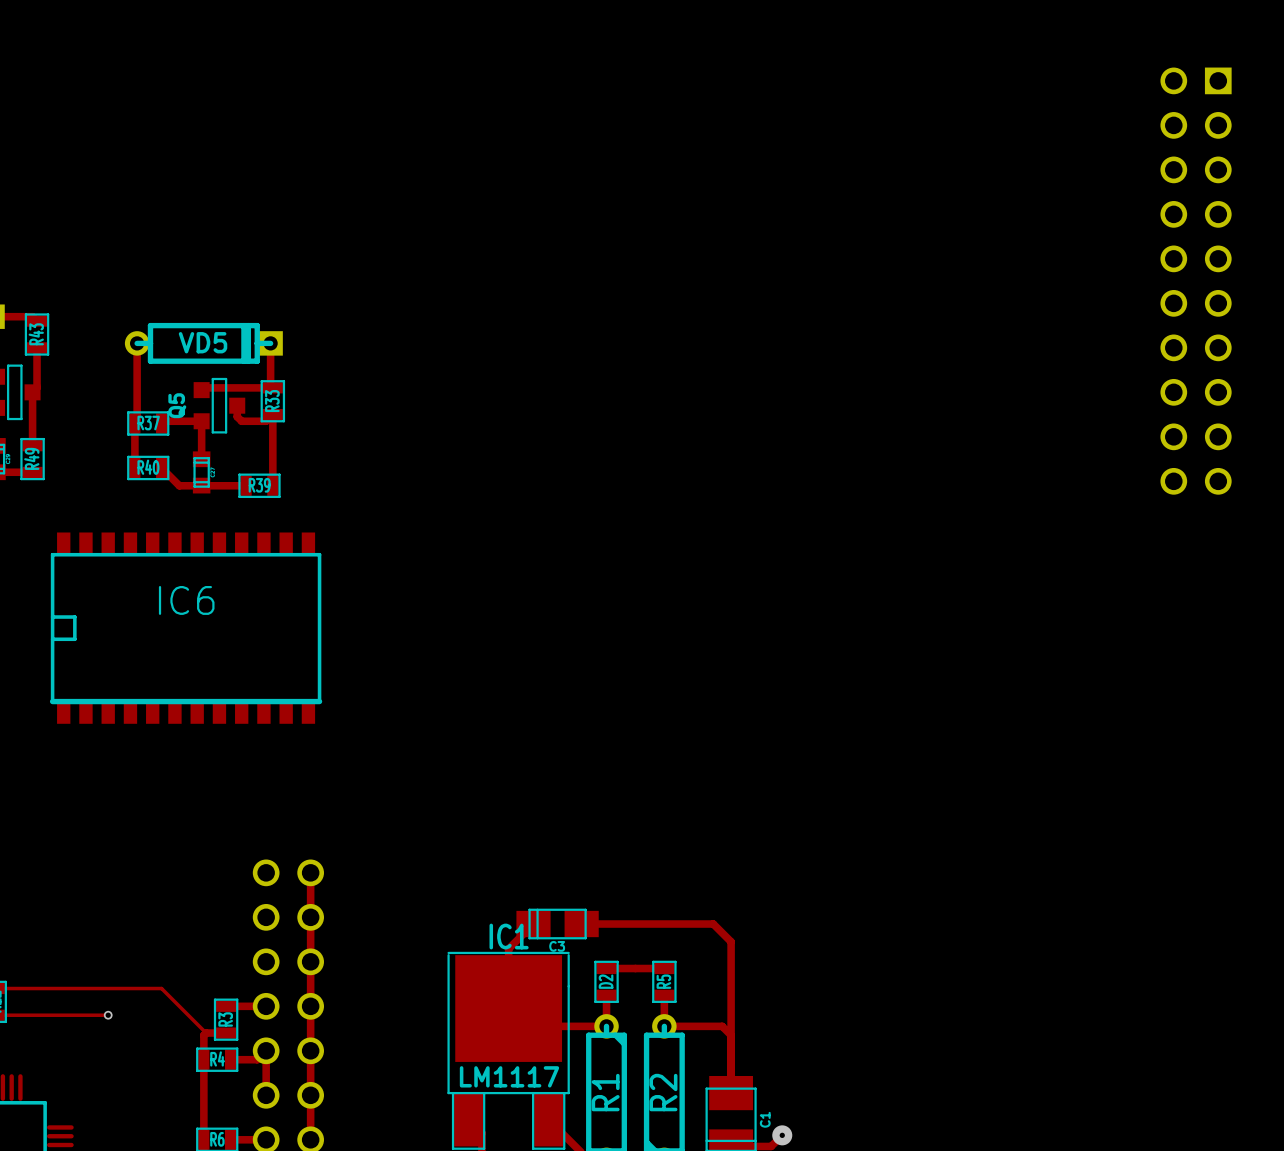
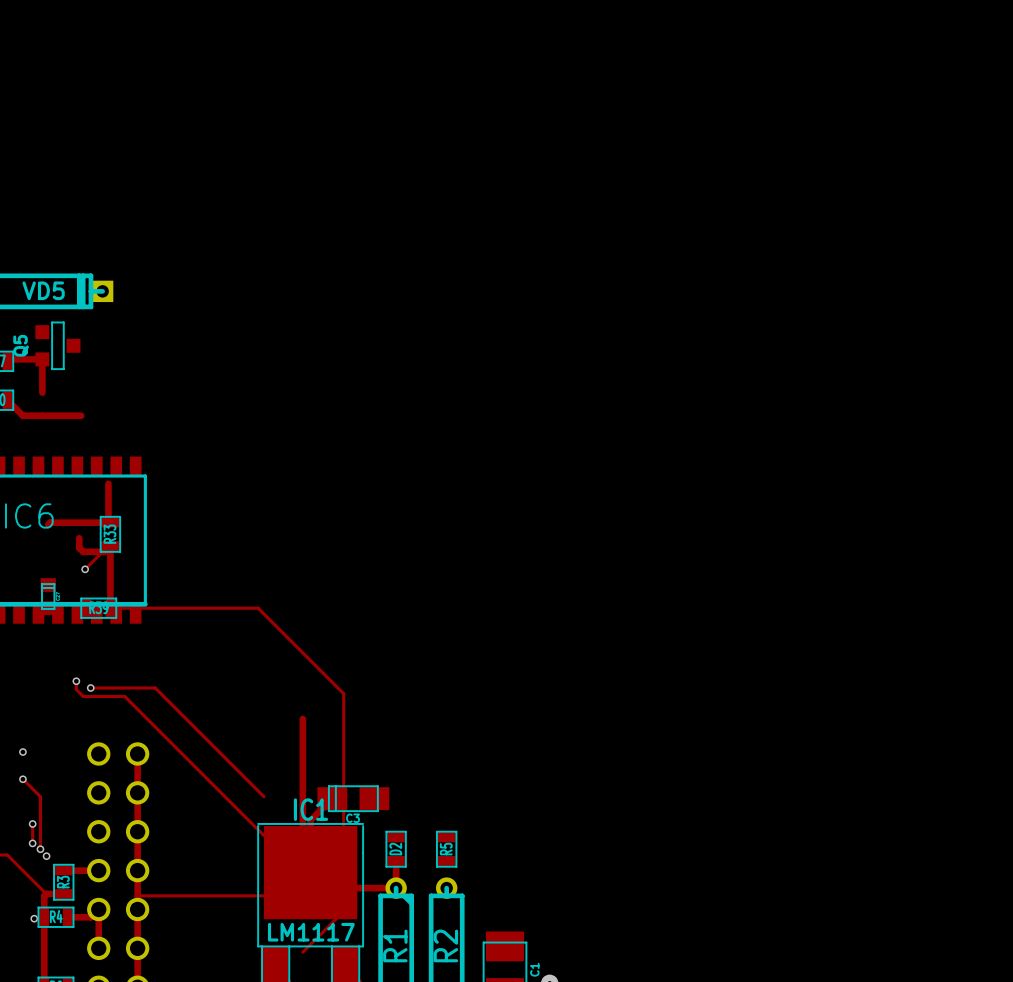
part: (1196, 281) -> none
track: (270, 343) (270, 385) (272, 387) (203, 387) (201, 390) -> (108, 483) (108, 520) (110, 522) (50, 522) (48, 524)
R33 position: (272, 401) -> (110, 534)
track: (237, 405) (237, 416) (241, 421) (266, 421) (272, 414) (272, 485) -> none
part position: (201, 472) -> (48, 596)
R39 position: (259, 485) -> (98, 608)
track: none -> (79, 538) (79, 547) (83, 551) (104, 551) (110, 546)
track: none -> (110, 546) (110, 608) (258, 608) (343, 693) (343, 911) (302, 952)
track: none -> (110, 546) (85, 569)
via: none -> (85, 569)
track: none -> (76, 681) (76, 689) (83, 696) (124, 696) (263, 835)
via: none -> (76, 681)
track: none -> (90, 688) (155, 688) (263, 796)
via: none -> (90, 688)
track: none -> (302, 718) (302, 913) (297, 913) (279, 895) (137, 895)
via: none -> (22, 752)
track: none -> (22, 779) (40, 796) (40, 849)
via: none -> (22, 779)
track: (581, 924) (713, 924) (731, 941) (731, 1093) -> none
track: none -> (32, 823) (32, 843)
via: none -> (32, 823)
track: (606, 968) (664, 968) -> none
via: none -> (32, 843)
via: none -> (40, 849)
via: none -> (46, 856)
track: (664, 995) (664, 1026) (722, 1026) (731, 1035) -> none
via: none -> (34, 918)

